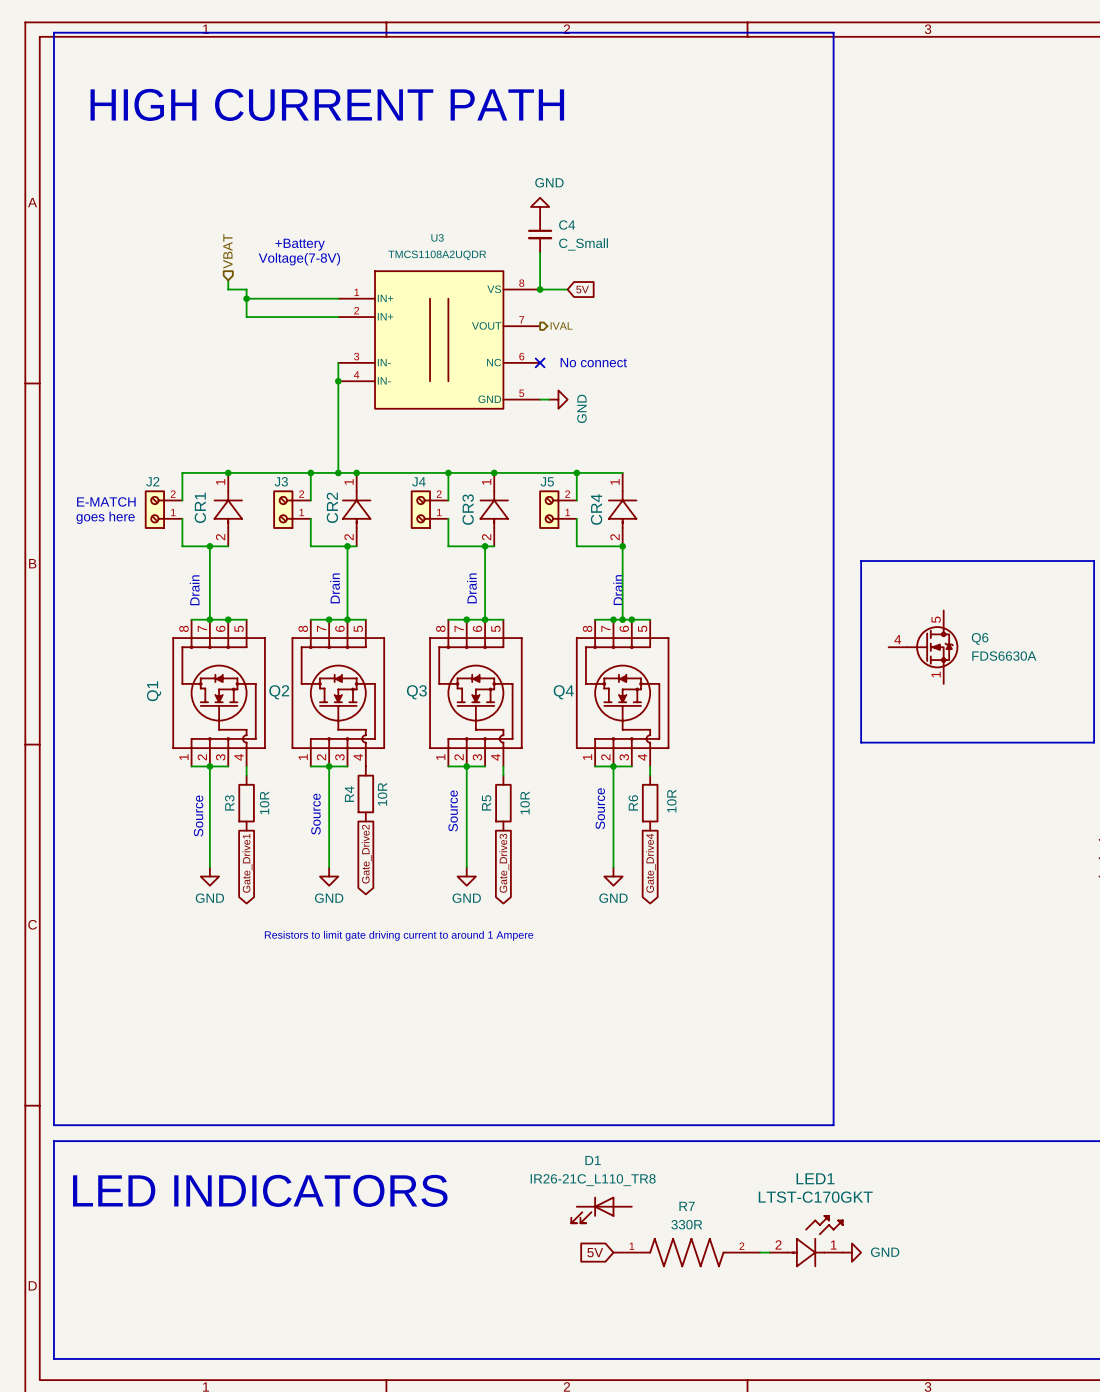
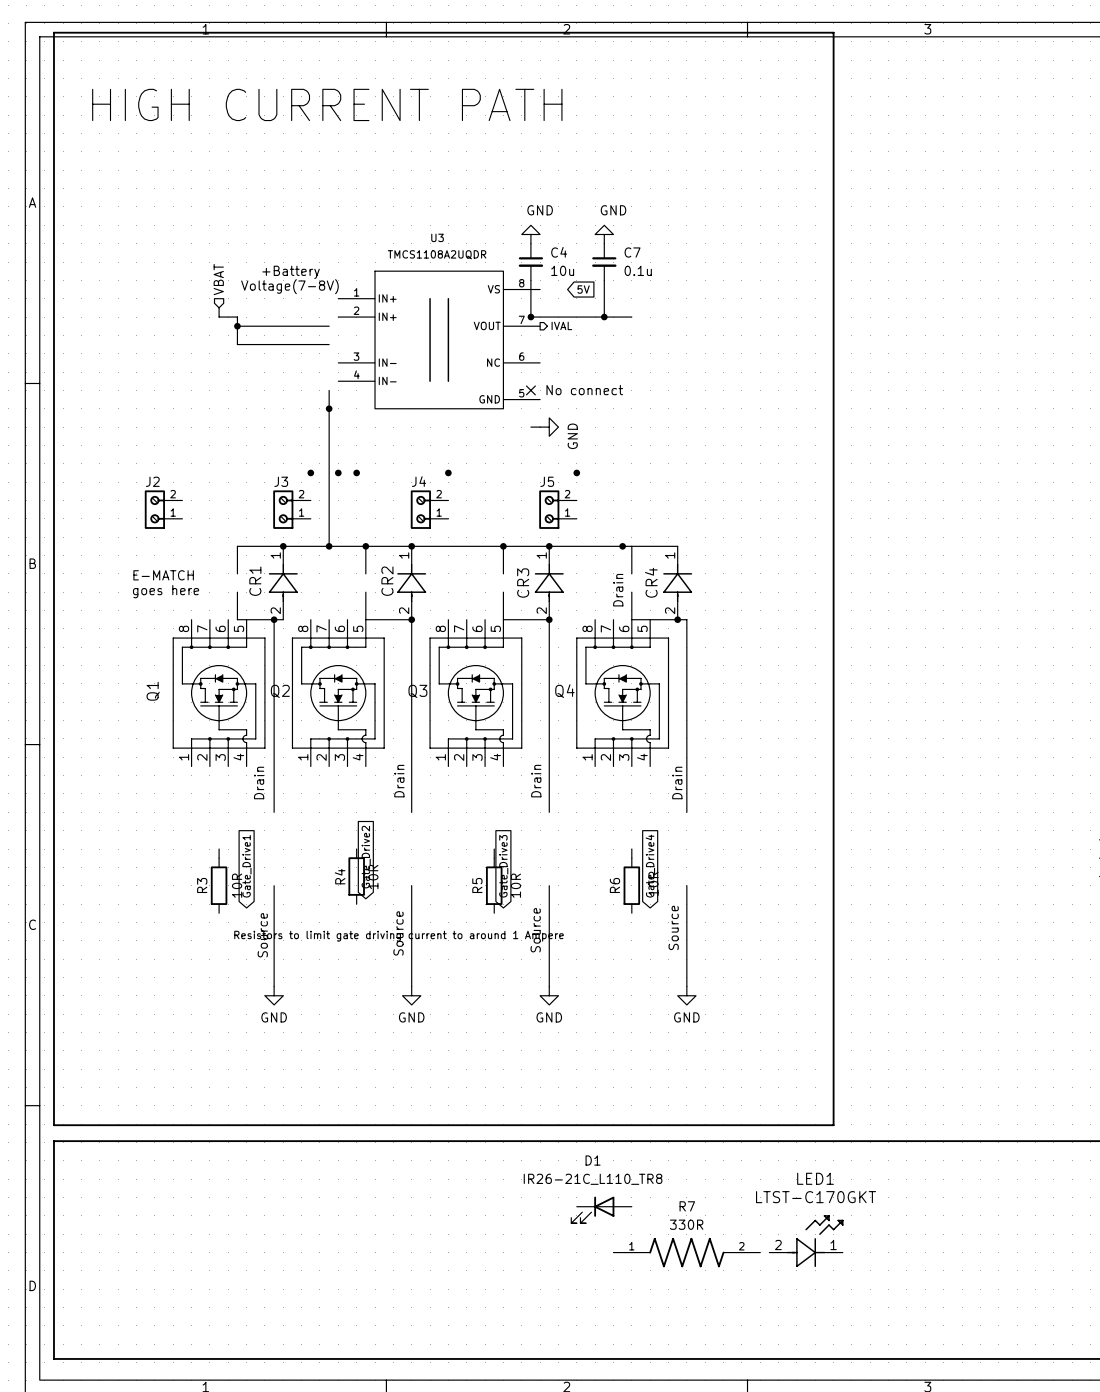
power symbol position: GND (540, 206) -> GND (530, 234)
C4 position: (540, 234) -> (530, 262)
power symbol: none -> GND (604, 234)
text position: +Battery (300, 244) -> +Battery (291, 272)
C4 value: C_Small (583, 244) -> 10u (562, 270)
hierarchical label position: VBAT (227, 251) -> VBAT (218, 279)
wire: (540, 252) (540, 289) (567, 289) -> none
text position: Voltage(7-8V) (299, 259) -> Voltage(7-8V) (289, 286)
C7: none -> 0.1u (604, 262)
wire: (228, 280) (228, 289) (246, 289) (246, 317) (338, 317) -> (219, 307) (219, 317) (237, 317) (237, 344) (329, 344)
wire: none -> (530, 280) (530, 317) (631, 317)
wire: none -> (604, 280) (604, 317)
junction position: (540, 289) -> (530, 317)
wire: (246, 298) (338, 298) -> (237, 326) (329, 326)
junction position: (246, 298) -> (237, 326)
junction: none -> (604, 317)
wire: (338, 362) (338, 472) -> none
no-connect mark position: (540, 362) -> (530, 390)
text position: No connect (593, 362) -> No connect (584, 390)
junction position: (338, 381) -> (329, 408)
wire: none -> (329, 390) (329, 546)
wire: (540, 399) (549, 399) -> (530, 427) (540, 427)
power symbol position: GND (558, 399) -> GND (549, 427)
junction: (228, 472) -> none
wire: (310, 472) (310, 500) -> (365, 546) (365, 573)
wire: (448, 472) (448, 500) -> (503, 546) (503, 573)
junction: (494, 472) -> none
wire: (576, 472) (576, 500) -> (631, 546) (631, 573)
wire: (622, 472) (182, 472) (182, 500) -> none
text position: E-MATCH (106, 501) -> E-MATCH (163, 575)
CR1 position: (228, 509) -> (283, 583)
CR2 position: (356, 509) -> (411, 583)
CR3 position: (494, 509) -> (549, 583)
CR4 position: (622, 509) -> (677, 583)
text position: goes here (105, 517) -> goes here (166, 591)
wire: (182, 518) (182, 546) (228, 546) -> none
wire: (310, 518) (310, 546) -> (237, 573) (237, 546) (310, 546)
wire: (448, 518) (448, 546) -> (356, 546) (448, 546)
wire: (576, 518) (576, 546) -> (494, 546) (576, 546)
wire: (209, 546) (209, 619) -> none
junction: (209, 546) -> none
junction: none -> (283, 546)
junction: none -> (329, 546)
wire: (347, 546) (347, 619) -> none
junction: (347, 546) -> none
junction: none -> (365, 546)
junction: none -> (411, 546)
wire: (485, 546) (485, 619) -> none
junction position: (485, 546) -> (503, 546)
junction: none -> (549, 546)
wire: (622, 546) (622, 619) -> (622, 546) (677, 546)
line: (861, 561) (1094, 561) (1094, 742) (861, 742) (861, 561) -> none
text: Drain (334, 588) -> none
text: Drain (471, 588) -> none
text: Drain (194, 590) -> none
wire: none -> (365, 592) (365, 619) (411, 619) (411, 812)
wire: none -> (503, 592) (503, 619) (549, 619) (549, 812)
wire: (191, 619) (237, 619) -> (237, 592) (237, 619)
junction: (209, 619) -> none
junction: (228, 619) -> none
wire: none -> (274, 619) (274, 812)
junction: none -> (274, 619)
wire: (310, 619) (365, 619) -> none
junction: (329, 619) -> none
junction: (347, 619) -> none
junction: none -> (411, 619)
wire: (448, 619) (503, 619) -> none
junction: (466, 619) -> none
junction: (485, 619) -> none
junction: none -> (549, 619)
wire: (595, 619) (631, 619) -> (631, 592) (631, 619)
junction: (613, 619) -> none
junction: (622, 619) -> none
junction: (631, 619) -> none
wire: none -> (650, 619) (686, 619) (686, 812)
junction: none -> (677, 619)
Q6: FDS6630A (923, 647) -> none
wire: (191, 766) (228, 766) -> (246, 619) (283, 619)
wire: (209, 766) (209, 867) -> none
junction: (209, 766) -> none
wire: (246, 766) (246, 775) -> (219, 849) (219, 858)
wire: (310, 766) (347, 766) -> none
wire: (329, 766) (329, 867) -> (274, 885) (274, 986)
junction: (329, 766) -> none
wire: (448, 766) (485, 766) -> none
wire: (466, 766) (466, 867) -> (411, 885) (411, 986)
junction: (466, 766) -> none
wire: (503, 766) (503, 775) -> (494, 849) (494, 858)
wire: (595, 766) (631, 766) -> none
wire: (613, 766) (613, 867) -> (549, 885) (549, 986)
junction: (613, 766) -> none
wire: (650, 766) (650, 775) -> (631, 849) (631, 858)
text: none -> Drain (399, 781)
text: none -> Drain (536, 781)
text: none -> Drain (259, 783)
text: none -> Drain (677, 783)
R4 position: (365, 793) -> (356, 876)
R3 position: (246, 803) -> (219, 885)
R5 position: (503, 803) -> (494, 885)
R6 position: (650, 803) -> (631, 885)
text: Source (600, 808) -> none
text: Source (453, 810) -> none
text: Source (315, 814) -> none
text: Source (198, 816) -> none
power symbol: GND (209, 876) -> none
power symbol: GND (329, 876) -> none
power symbol: GND (466, 876) -> none
power symbol: GND (613, 876) -> none
wire: none -> (686, 885) (686, 986)
text: none -> Source (673, 927)
text: none -> Source (535, 930)
text: none -> Source (398, 933)
text: none -> Source (262, 935)
power symbol: none -> GND (274, 995)
power symbol: none -> GND (411, 995)
power symbol: none -> GND (549, 995)
power symbol: none -> GND (686, 995)
text: LED INDICATORS (260, 1190) -> none
global label: 5V (595, 1252) -> none
wire: (760, 1252) (769, 1252) -> none
power symbol: GND (851, 1252) -> none

